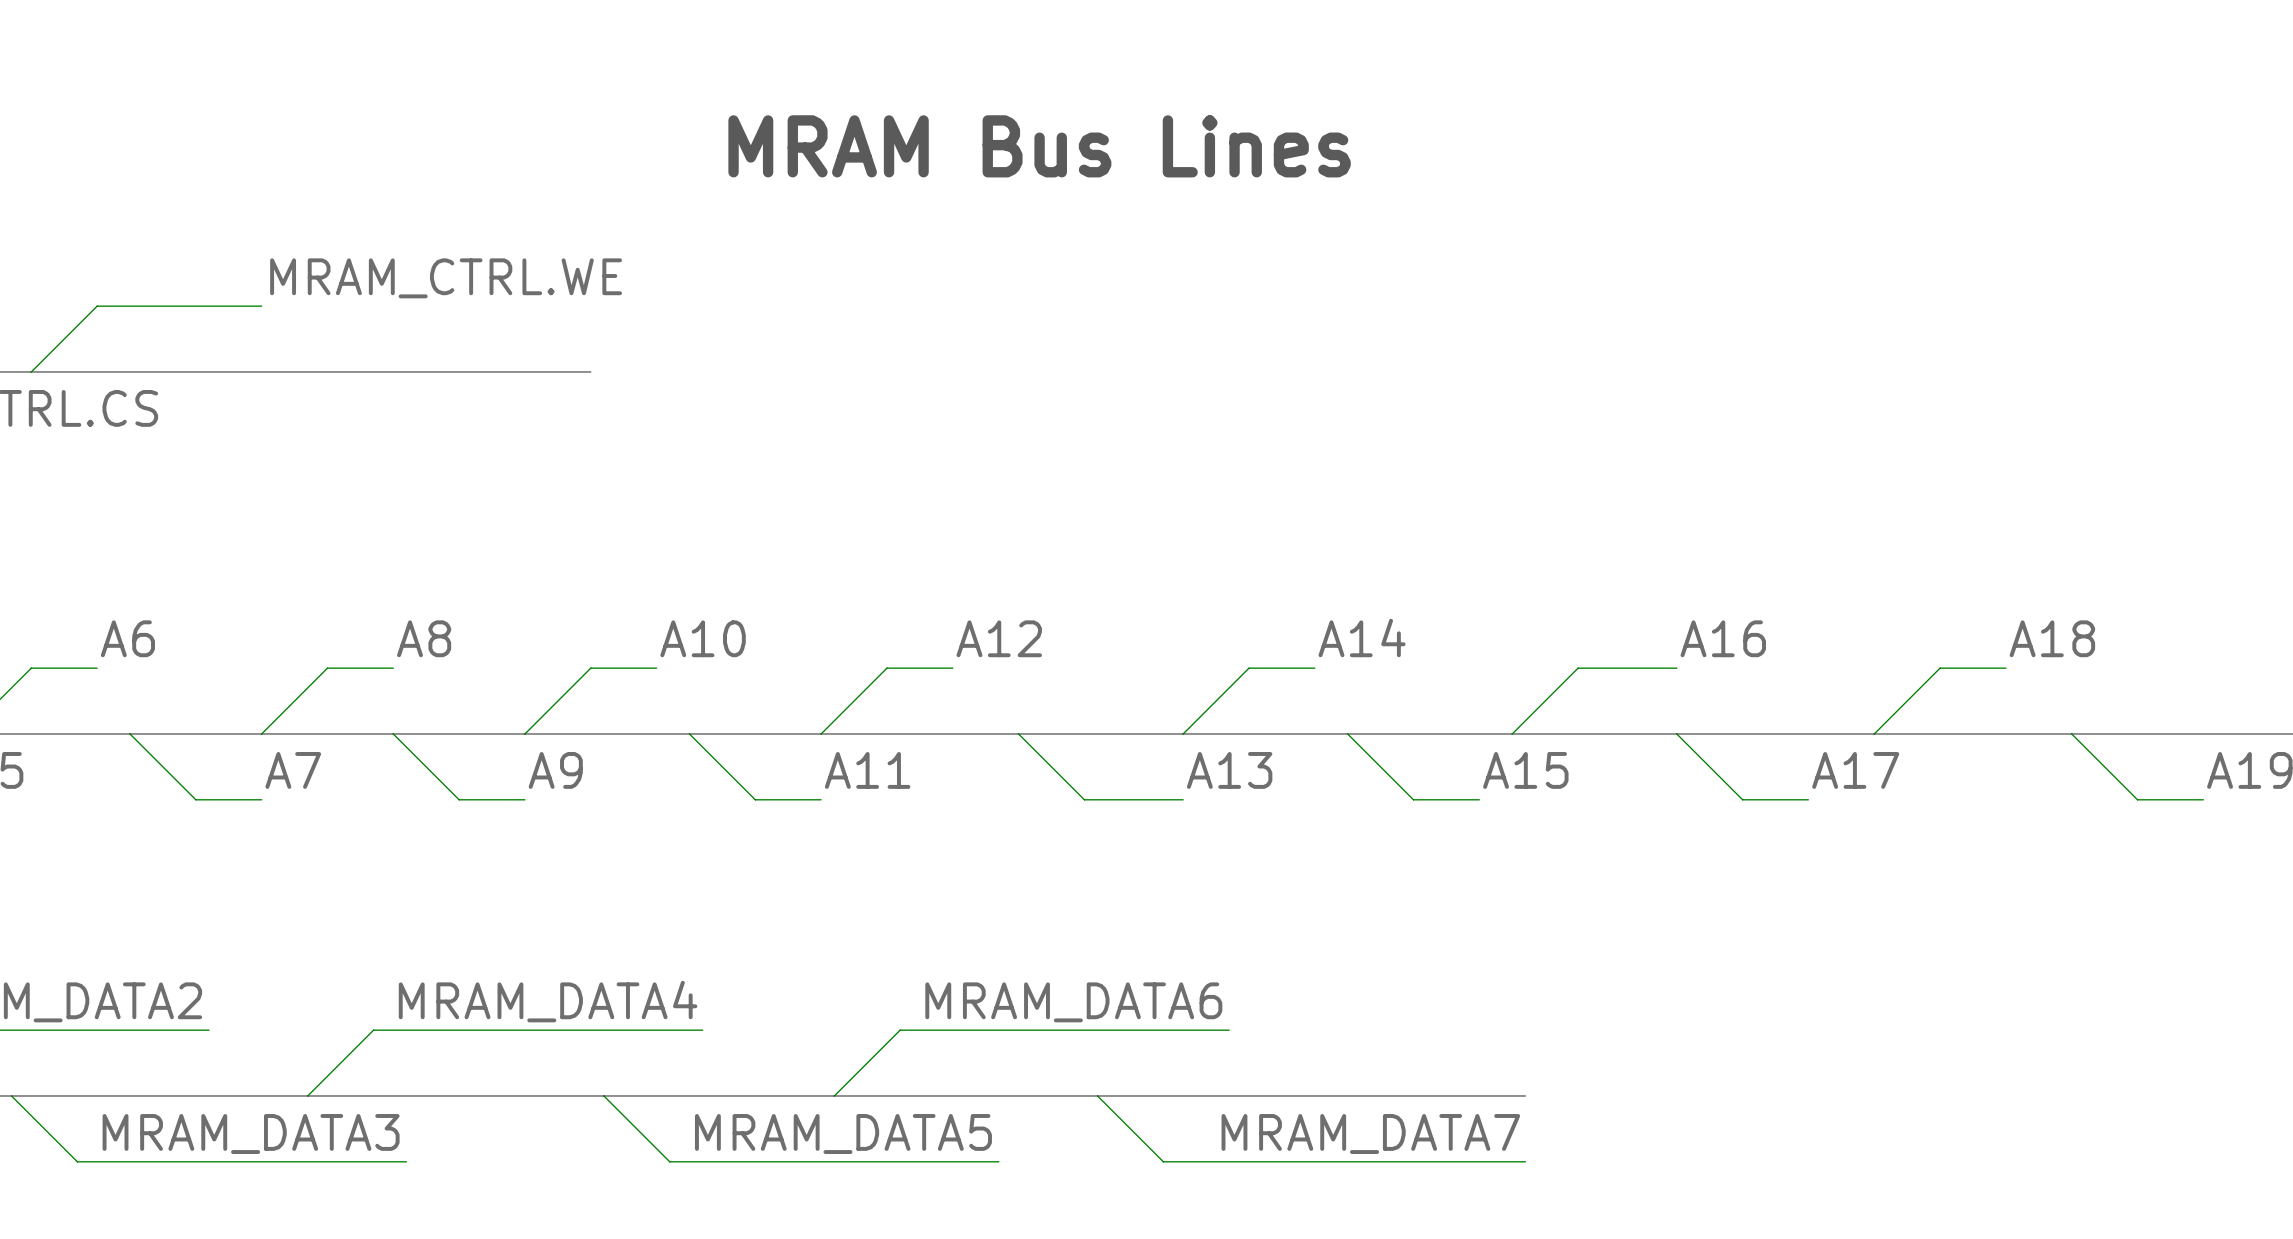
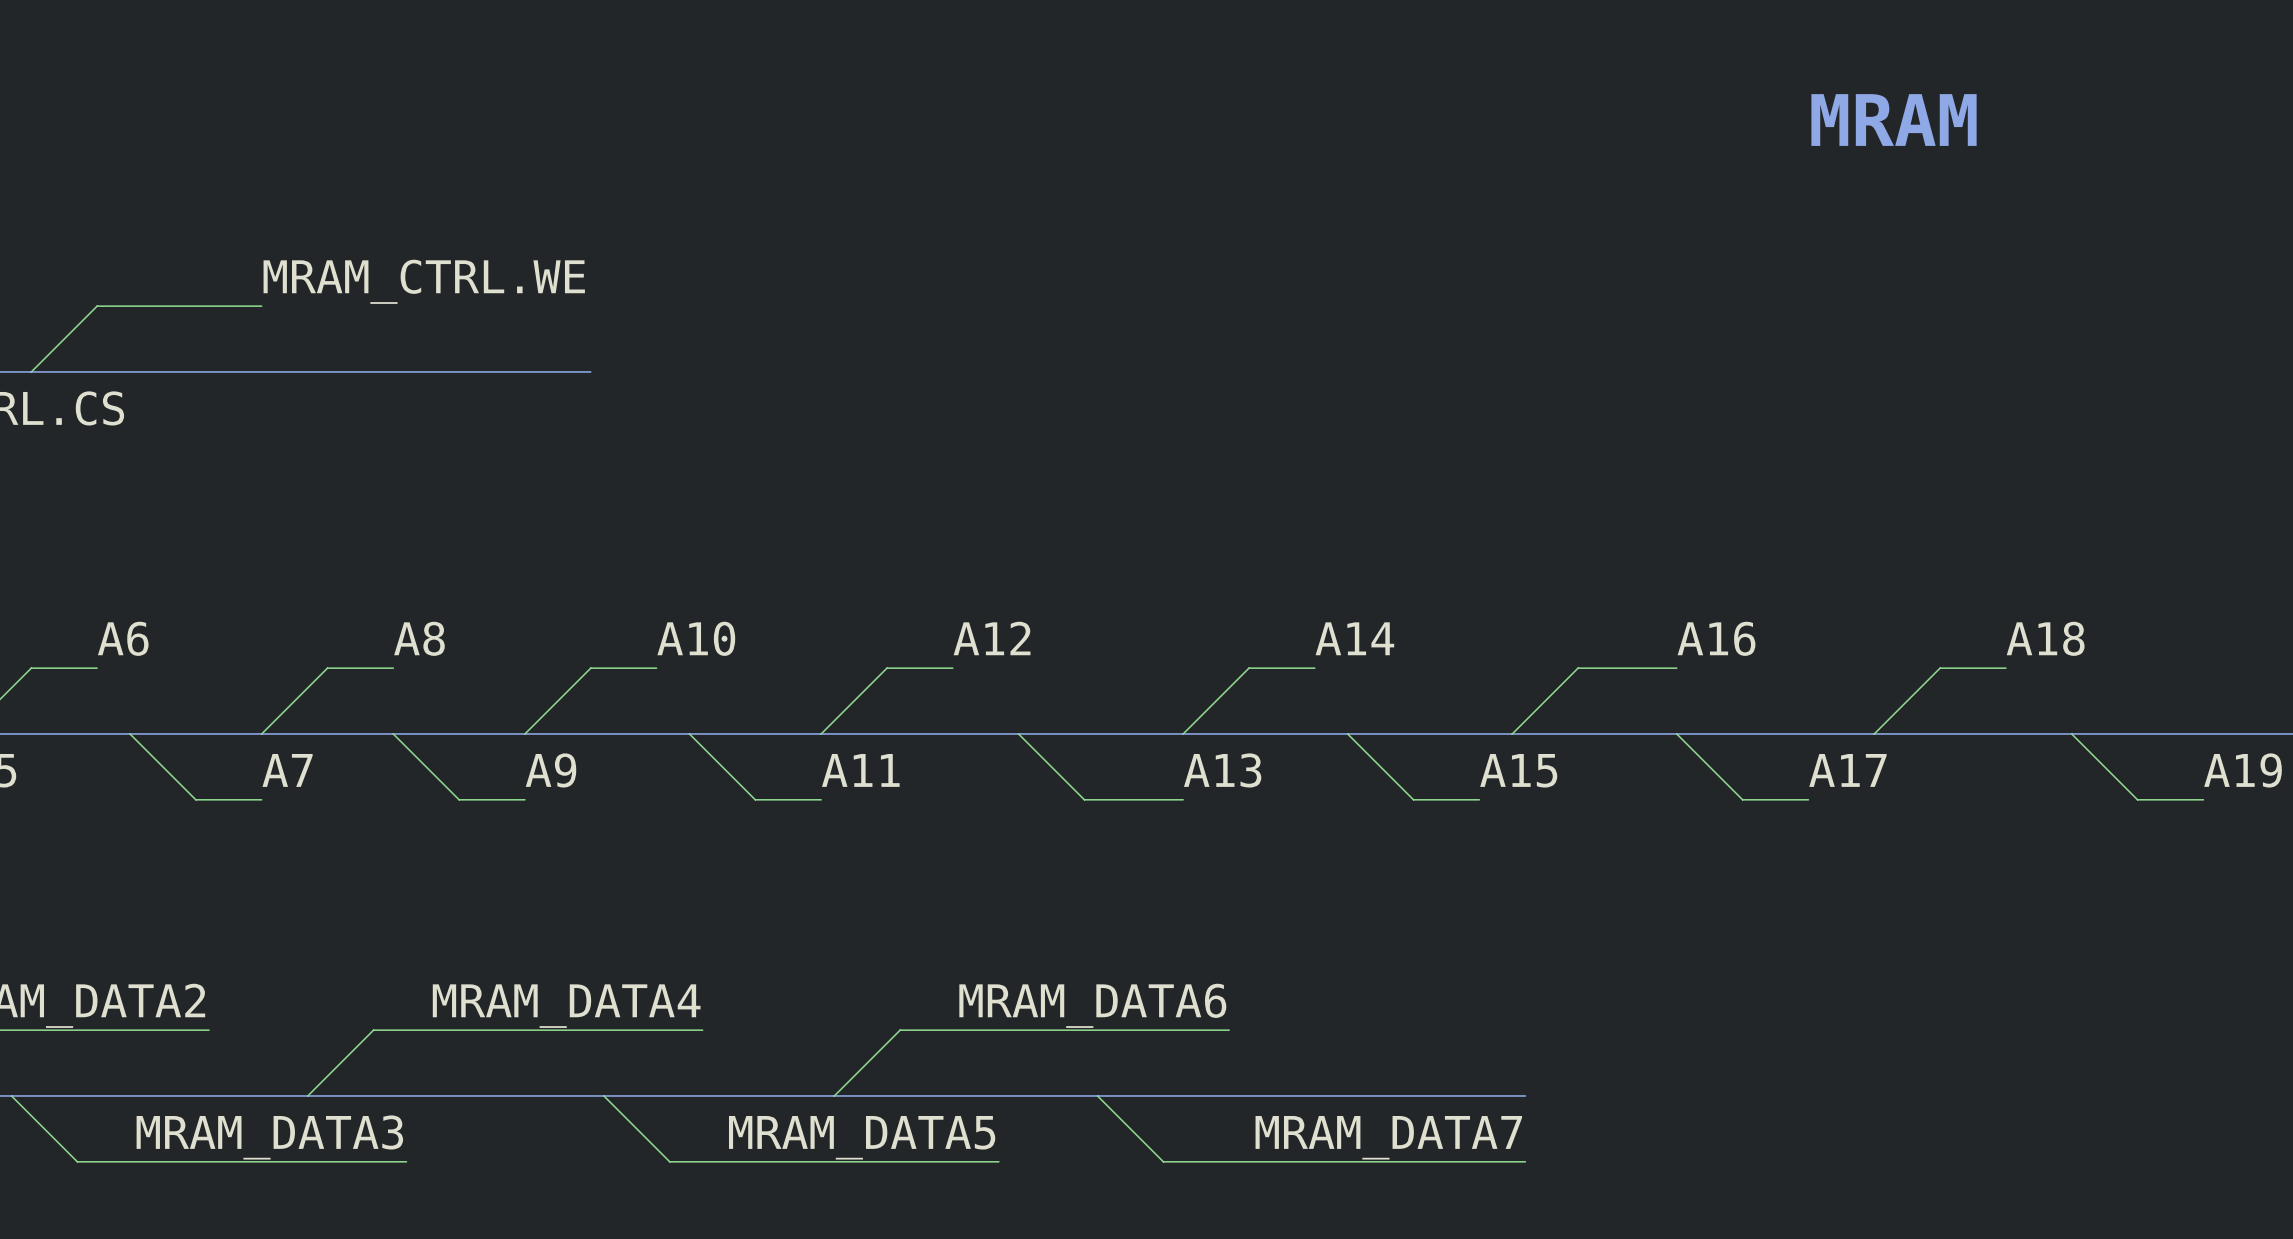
text: none -> MRAM (1894, 120)
text: MRAM Bus Lines (1039, 146) -> none

